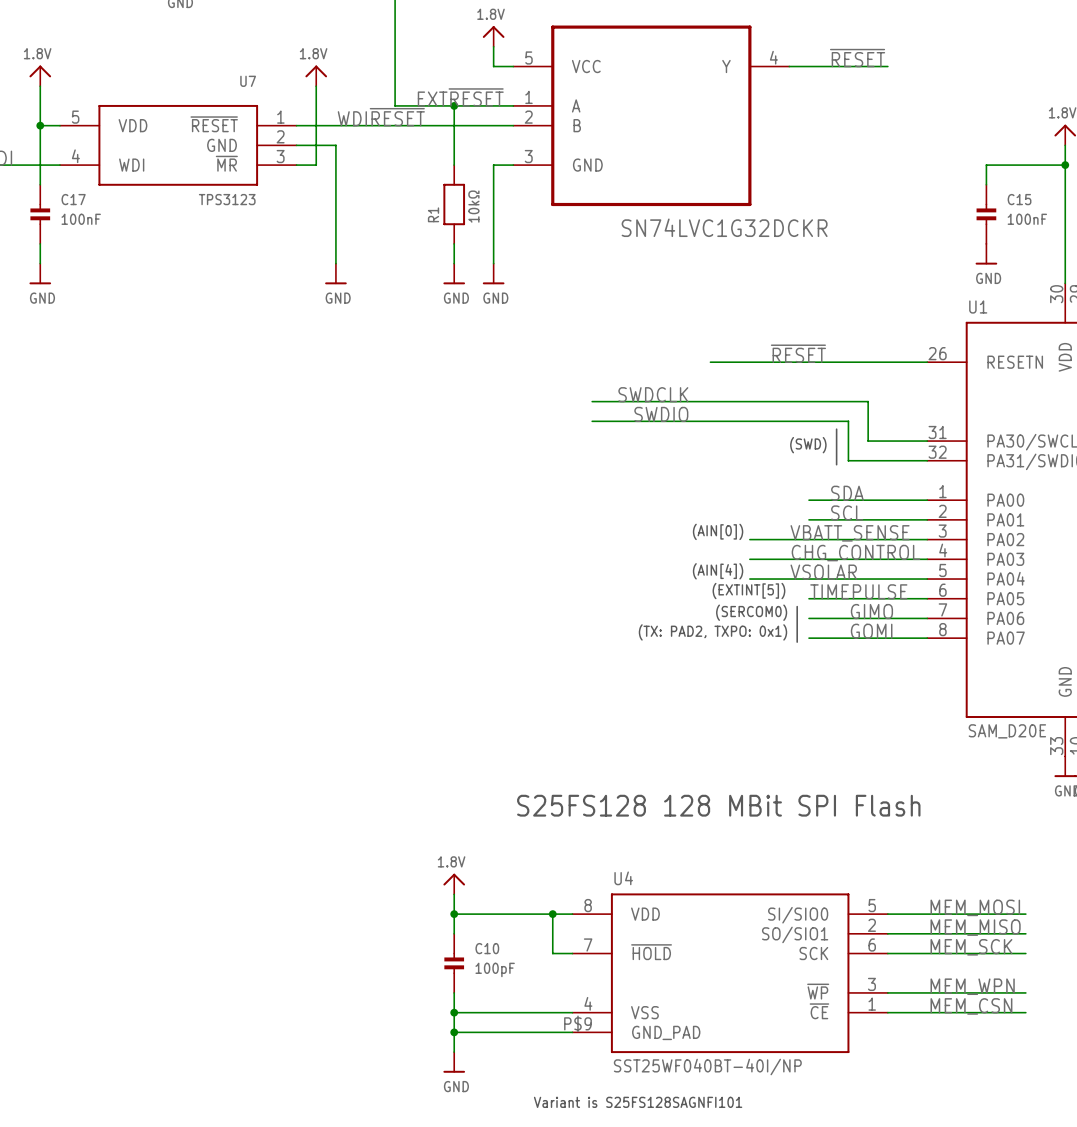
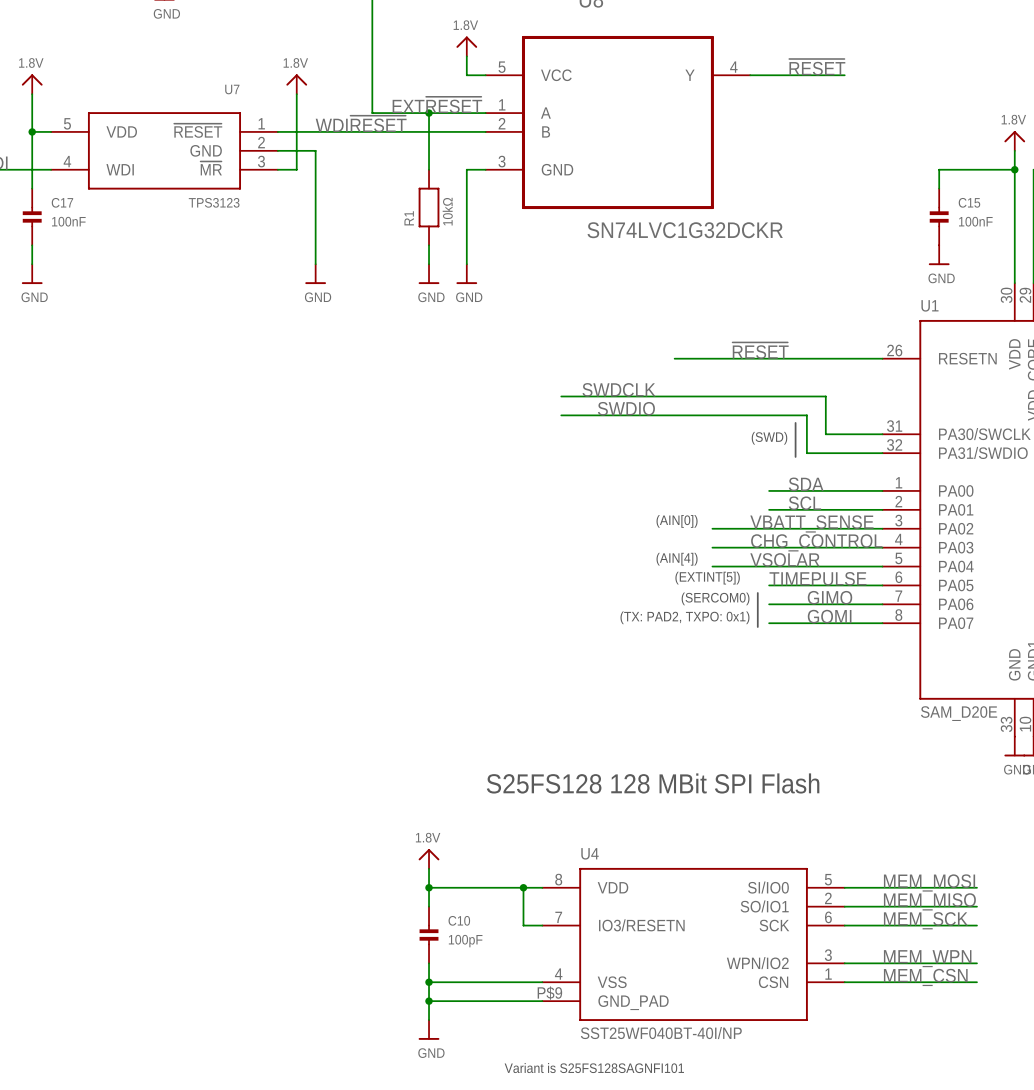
U4 pin name: SI/SIO0 (798, 915) -> SI/IO0 (768, 887)
U4 pin name: SO/SIO1 (795, 934) -> SO/IO1 (764, 906)
U4 pin name: ~{HOLD} (651, 952) -> IO3/RESETN (641, 925)
U4 pin name: ~{WP} (818, 991) -> WPN/IO2 (757, 963)
U4 pin name: ~{CE} (819, 1011) -> CSN (773, 982)

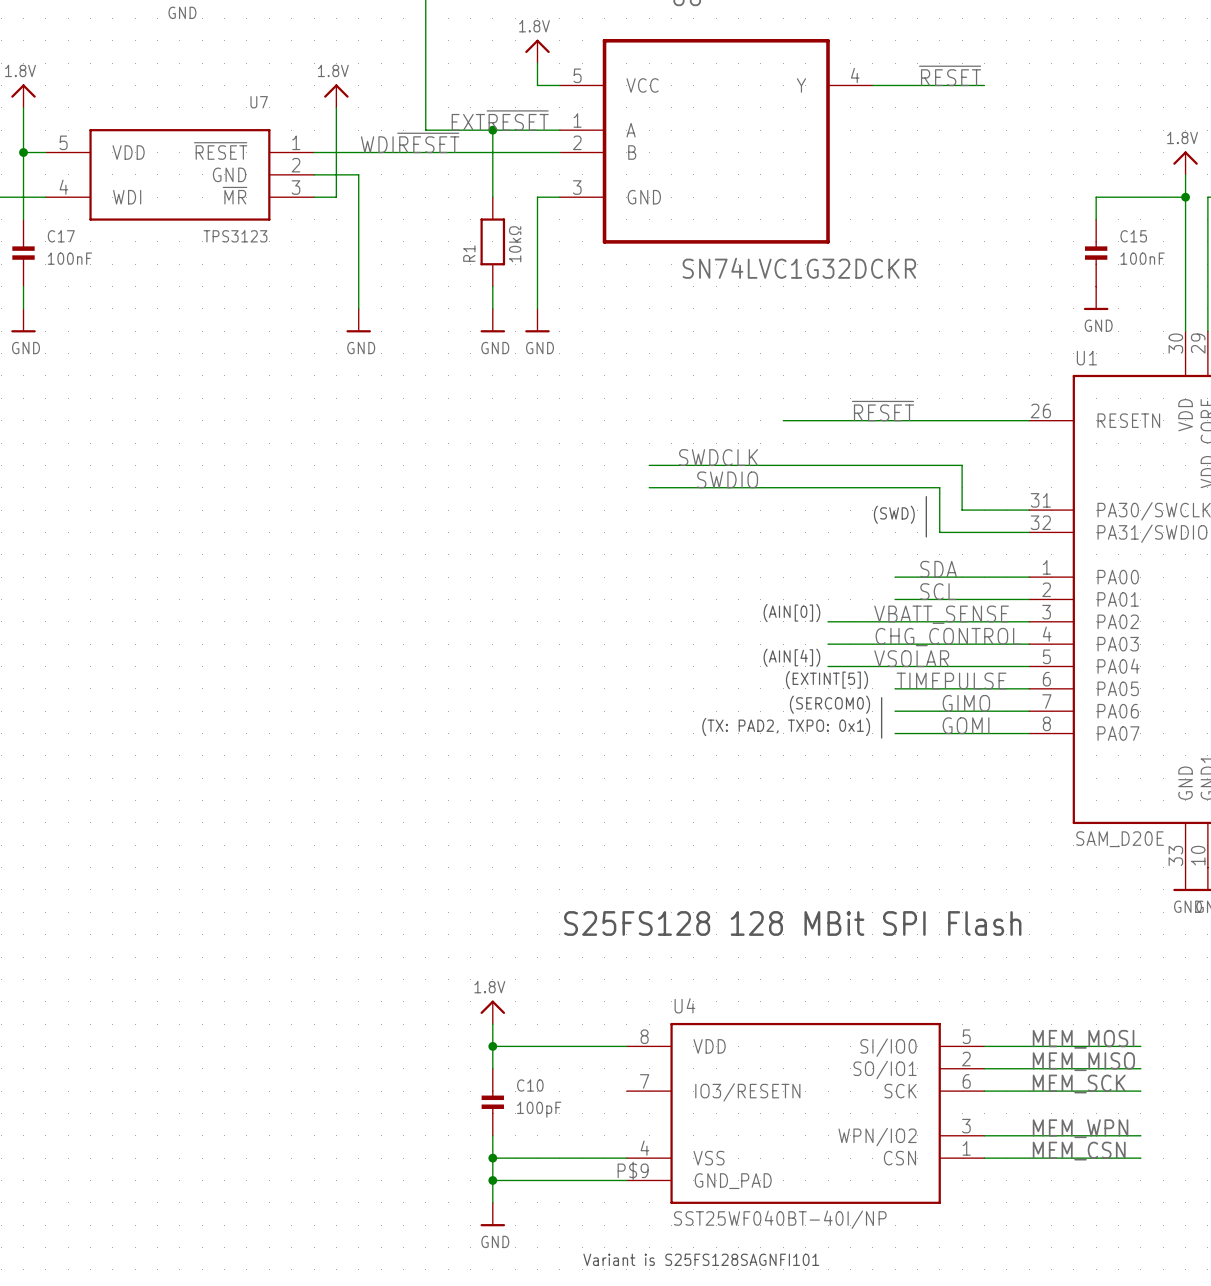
wire: (523, 887) (523, 925) (542, 925) -> none
junction: (523, 887) -> none

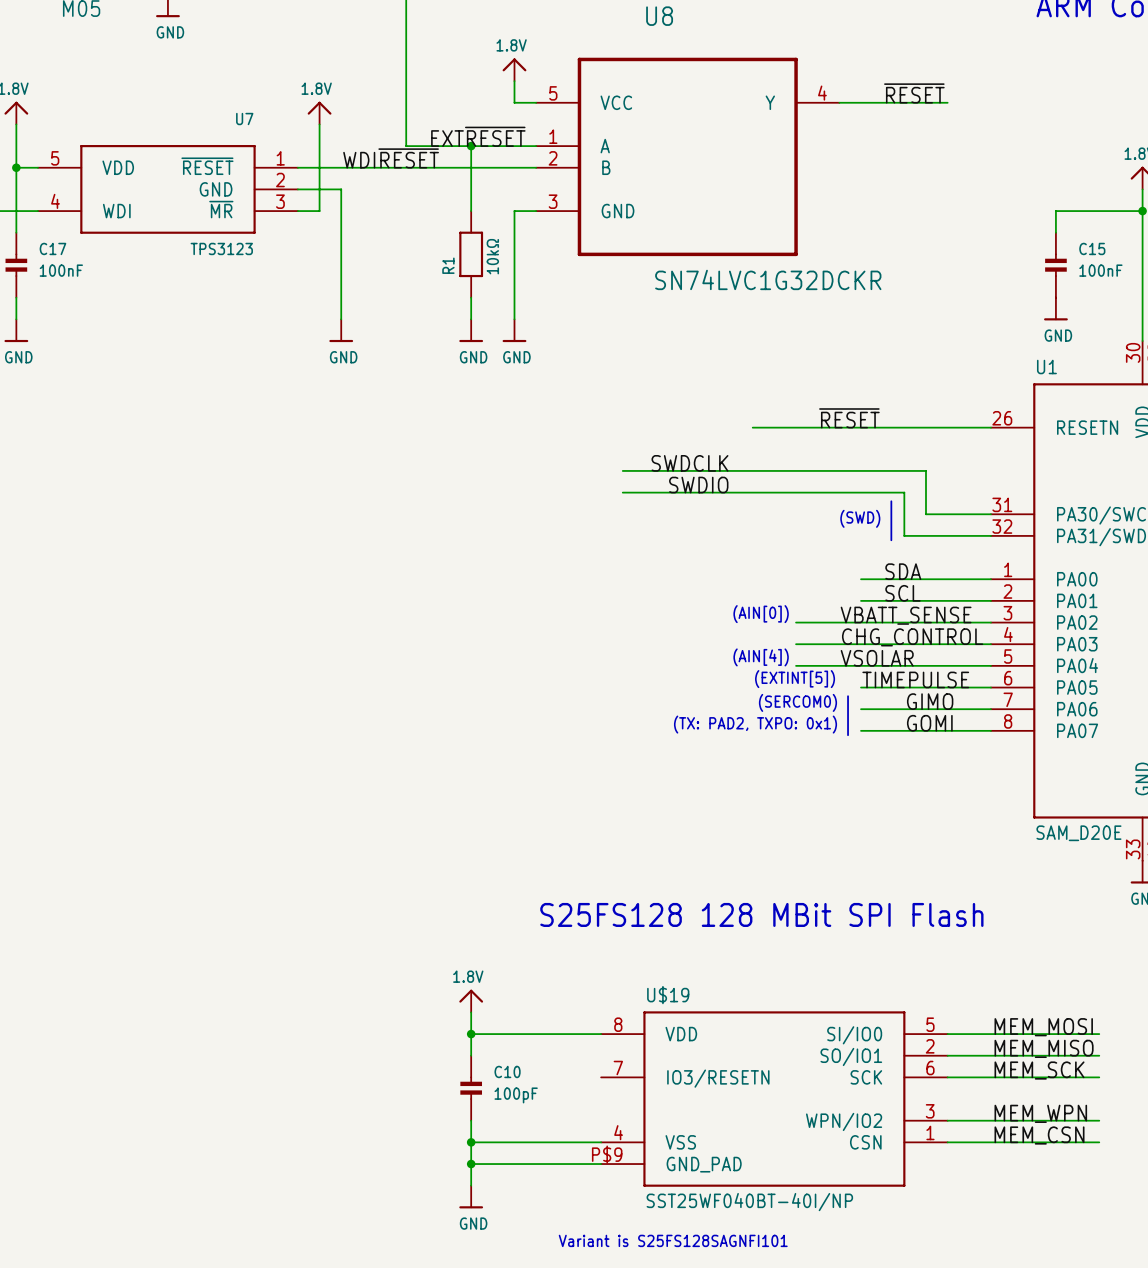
U4 name: U4 (684, 1005) -> U$19 (668, 995)

